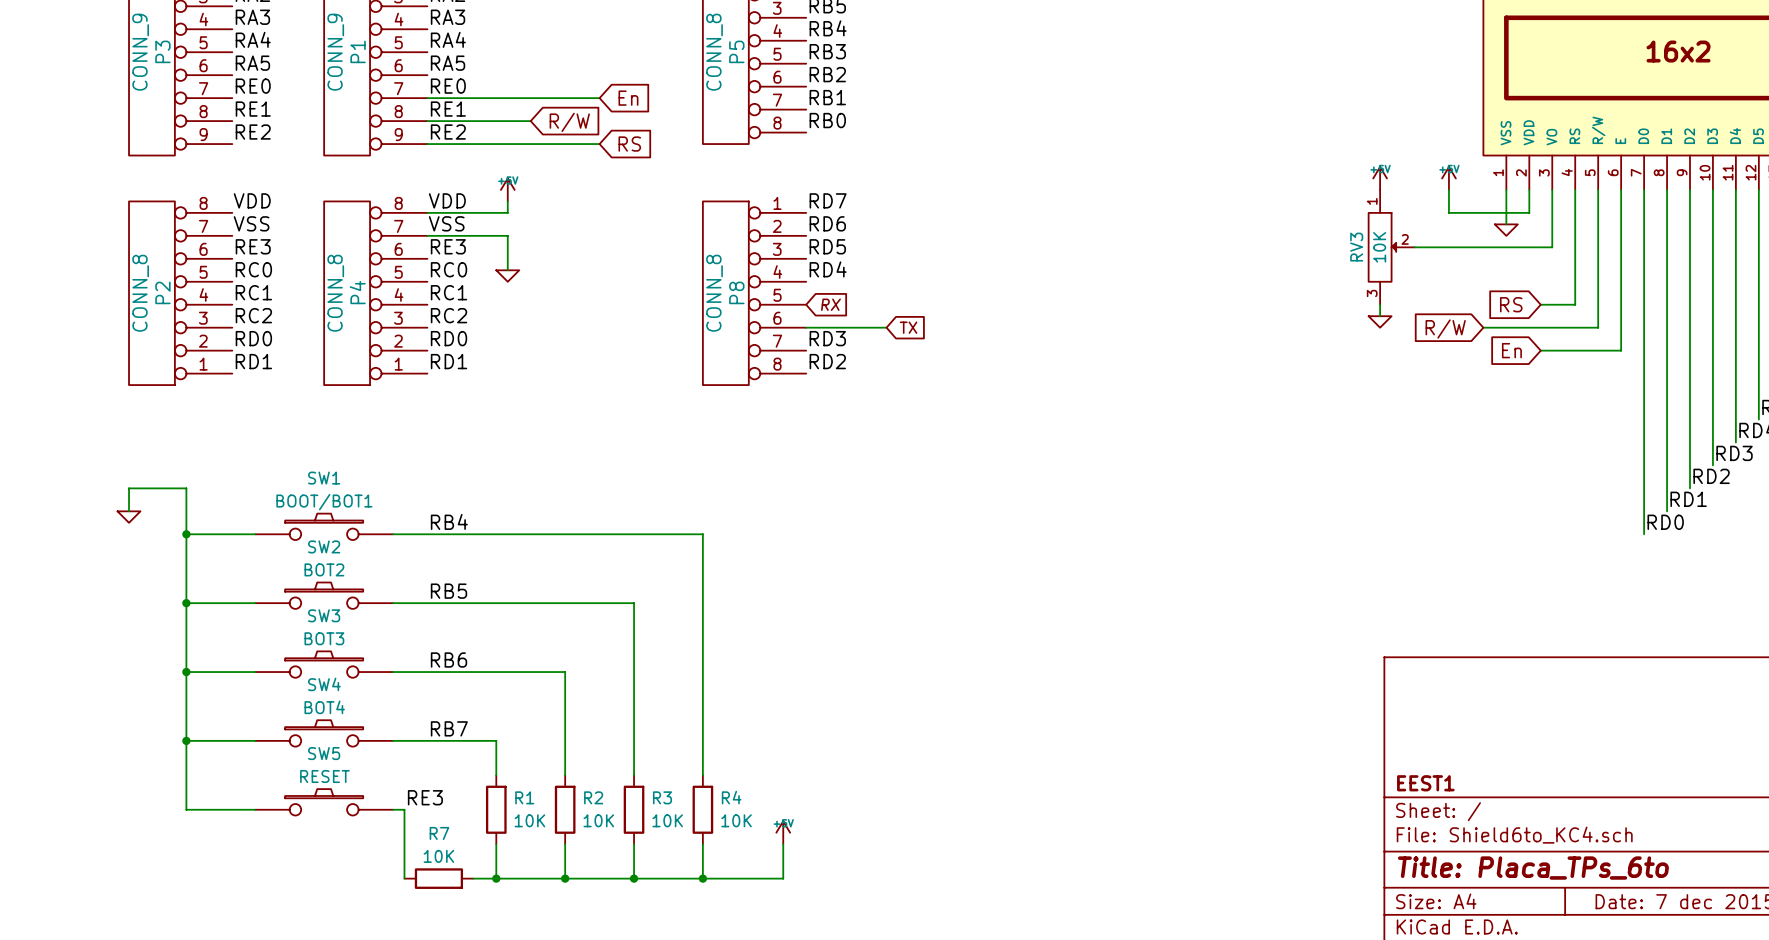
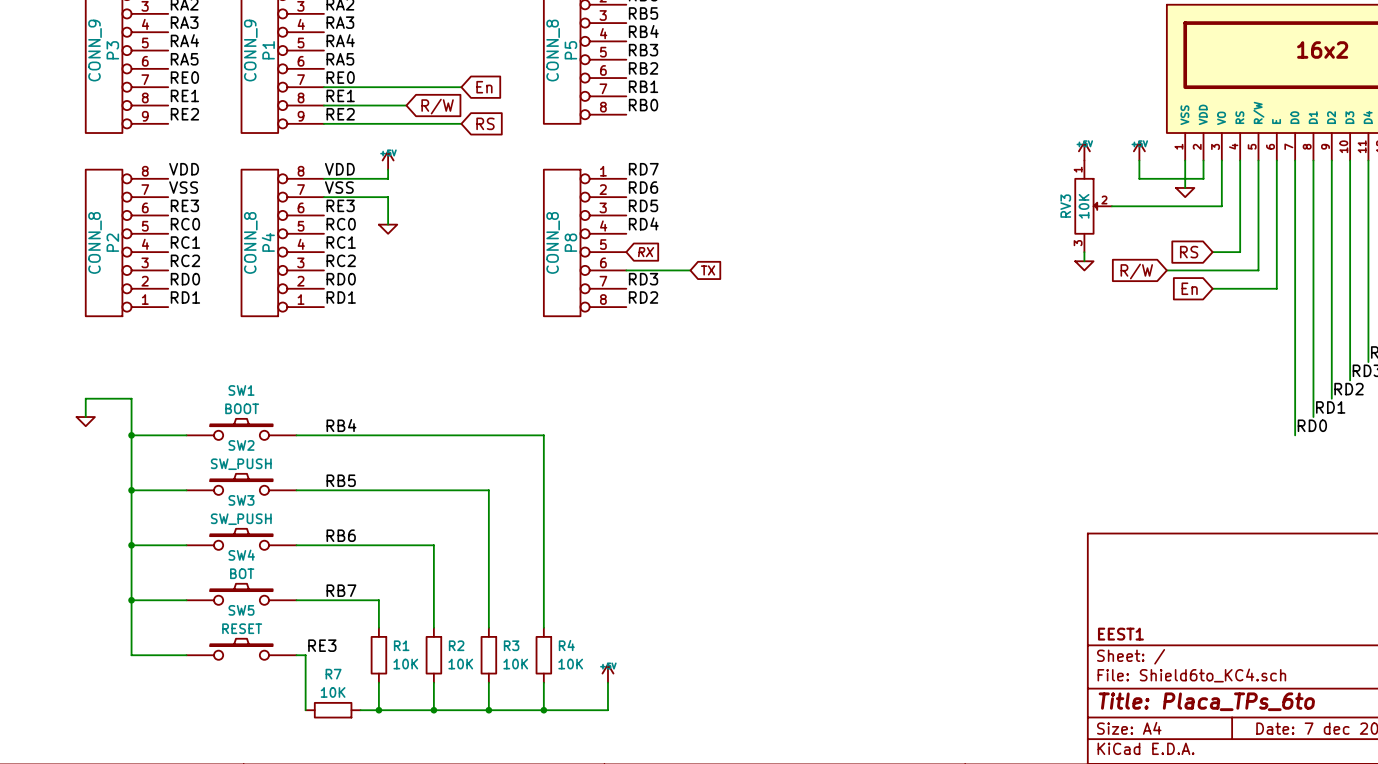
SW1 value: BOOT/BOT1 (324, 502) -> BOOT (242, 408)
SW2 value: BOT2 (324, 569) -> SW_PUSH (241, 464)
SW3 value: BOT3 (324, 638) -> SW_PUSH (241, 519)
SW4 value: BOT4 (324, 707) -> BOT (242, 573)

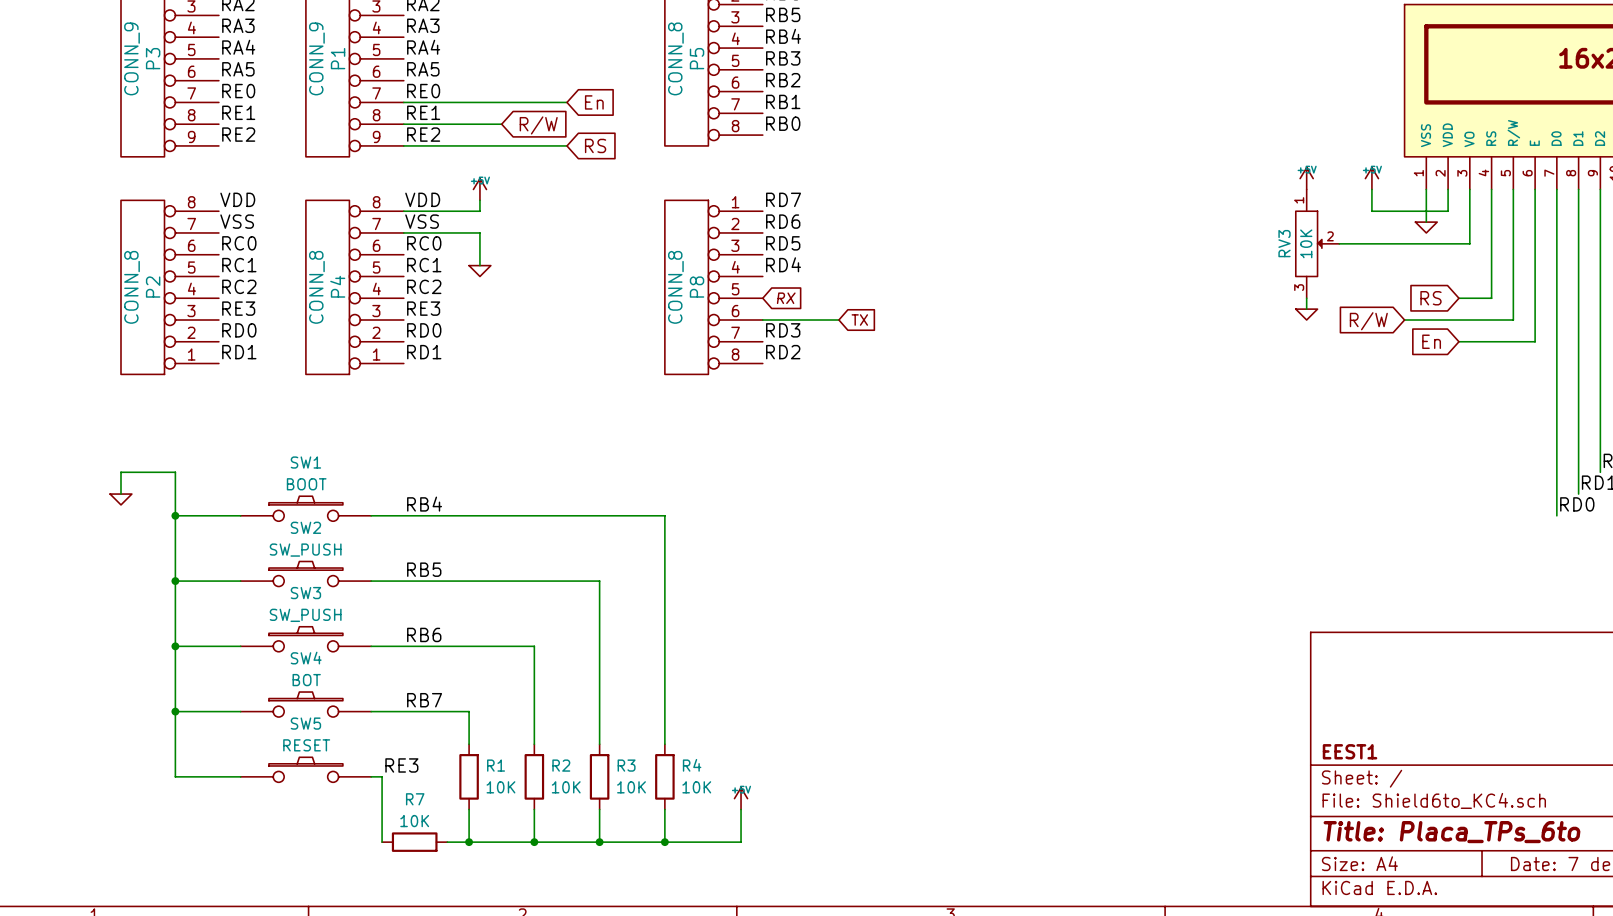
label: RE3 (184, 205) -> RC0 (239, 243)
label: RE3 (340, 205) -> RC0 (424, 243)
label: RC0 (185, 224) -> RC1 (239, 265)
label: RC0 (341, 224) -> RC1 (424, 265)
label: RC1 (185, 242) -> RC2 (239, 286)
label: RC1 (341, 242) -> RC2 (424, 286)
label: RC2 (185, 260) -> RE3 (238, 308)
label: RC2 (341, 260) -> RE3 (423, 308)

